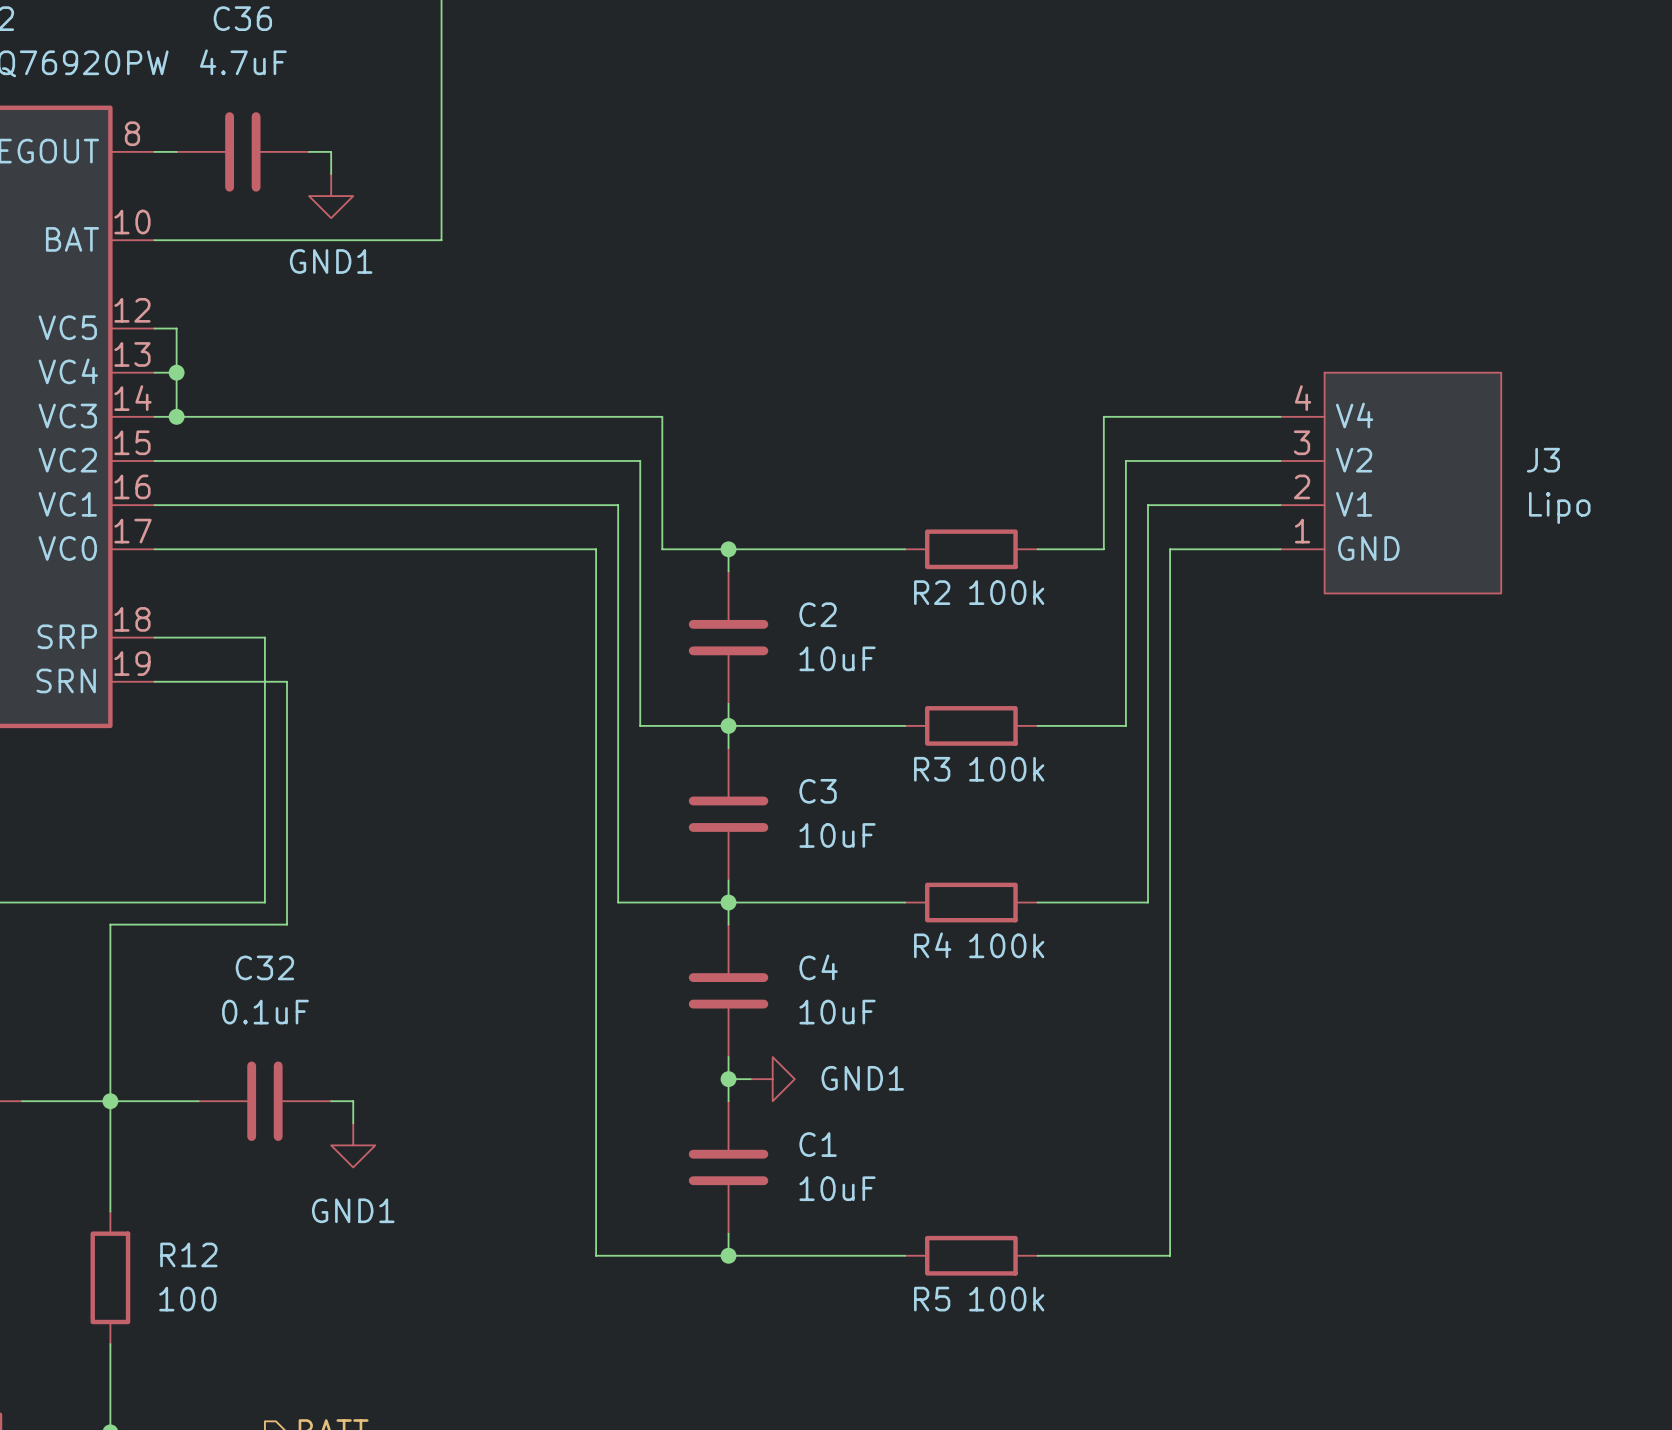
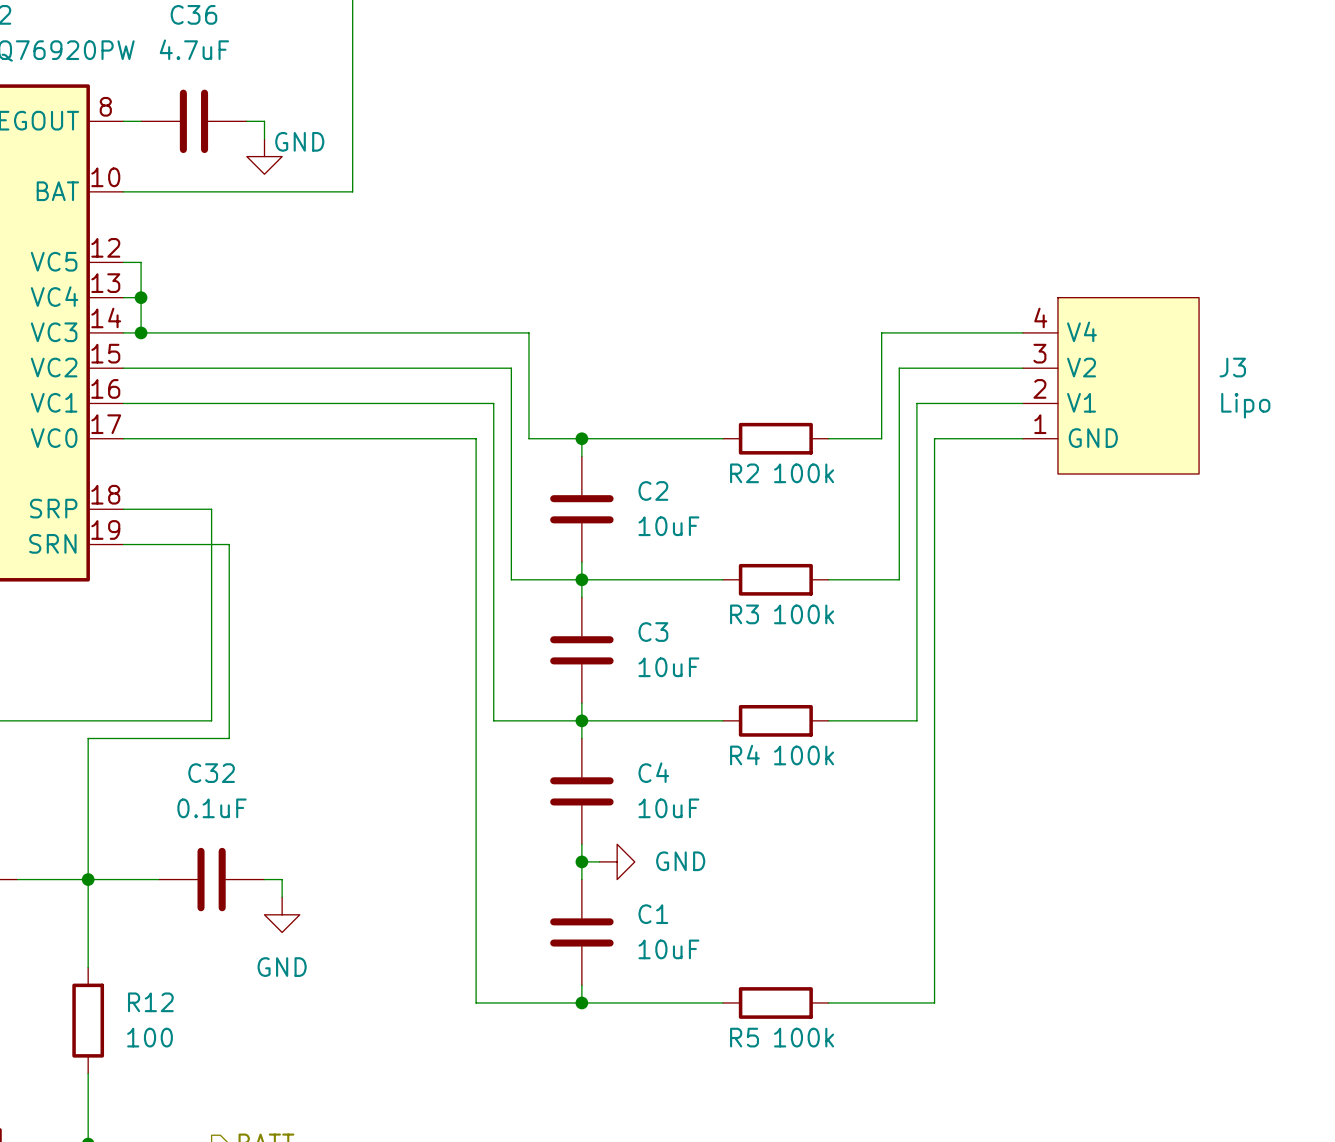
power symbol: GND1 (331, 196) -> GND (264, 156)
power symbol: GND1 (772, 1079) -> GND (617, 861)
power symbol: GND1 (353, 1145) -> GND (282, 914)

